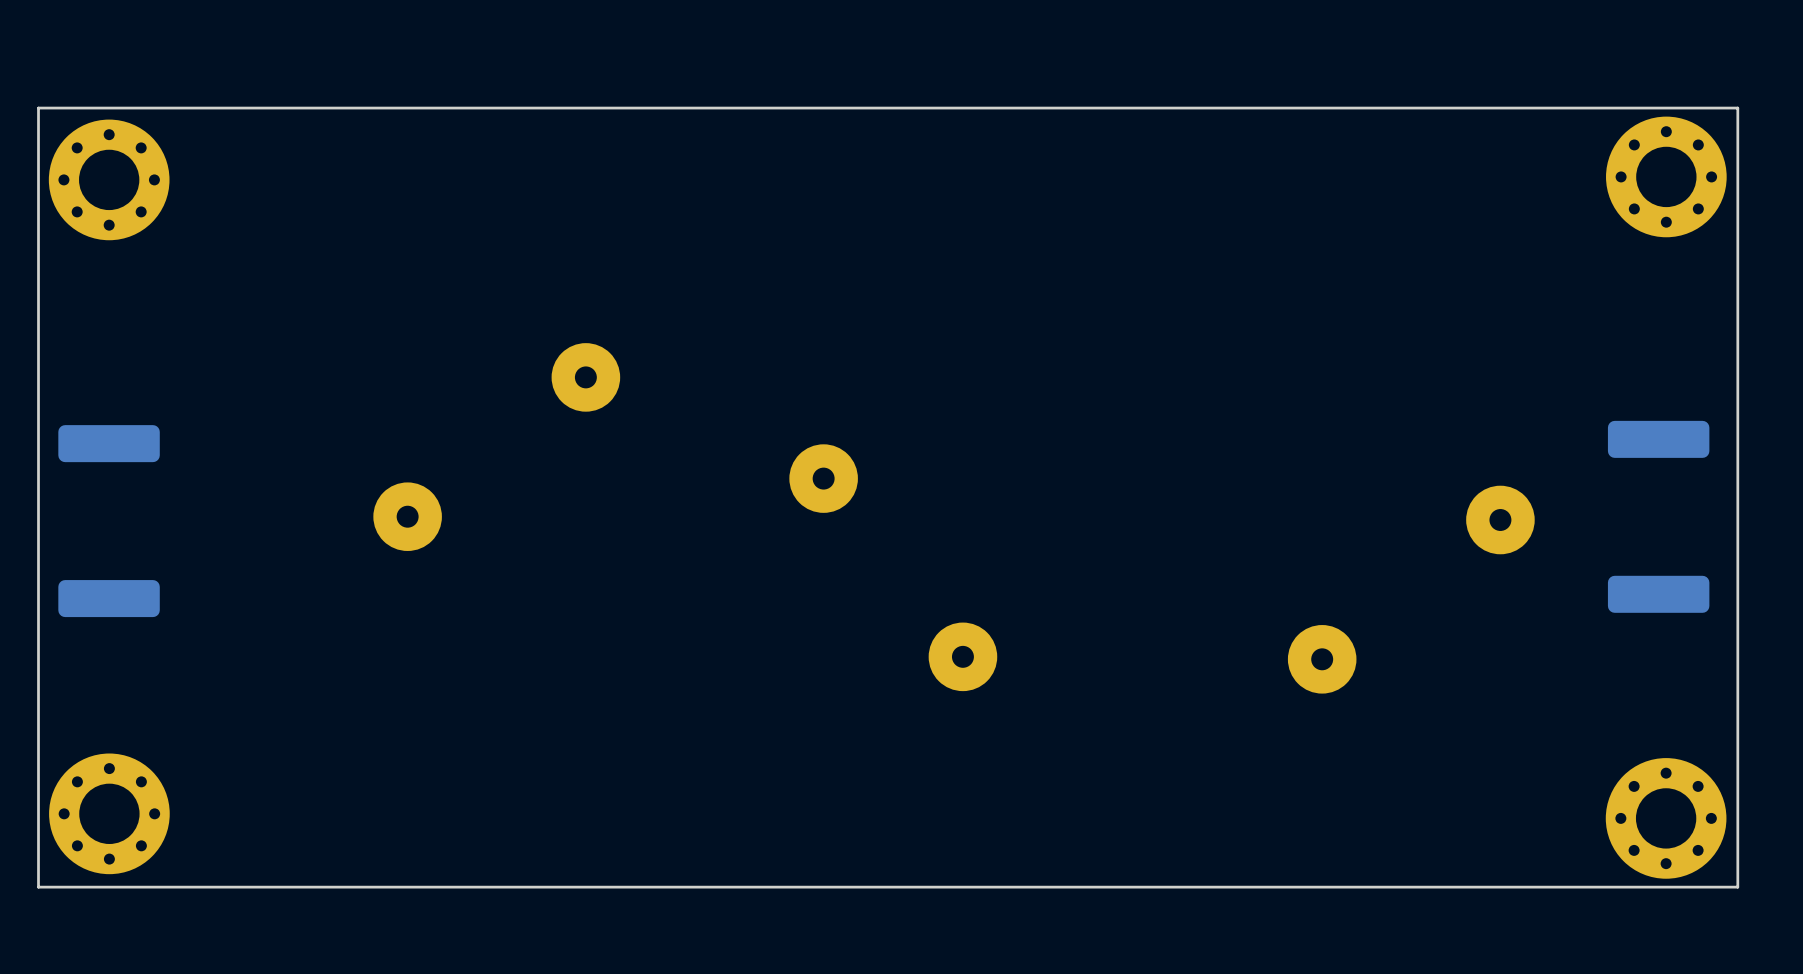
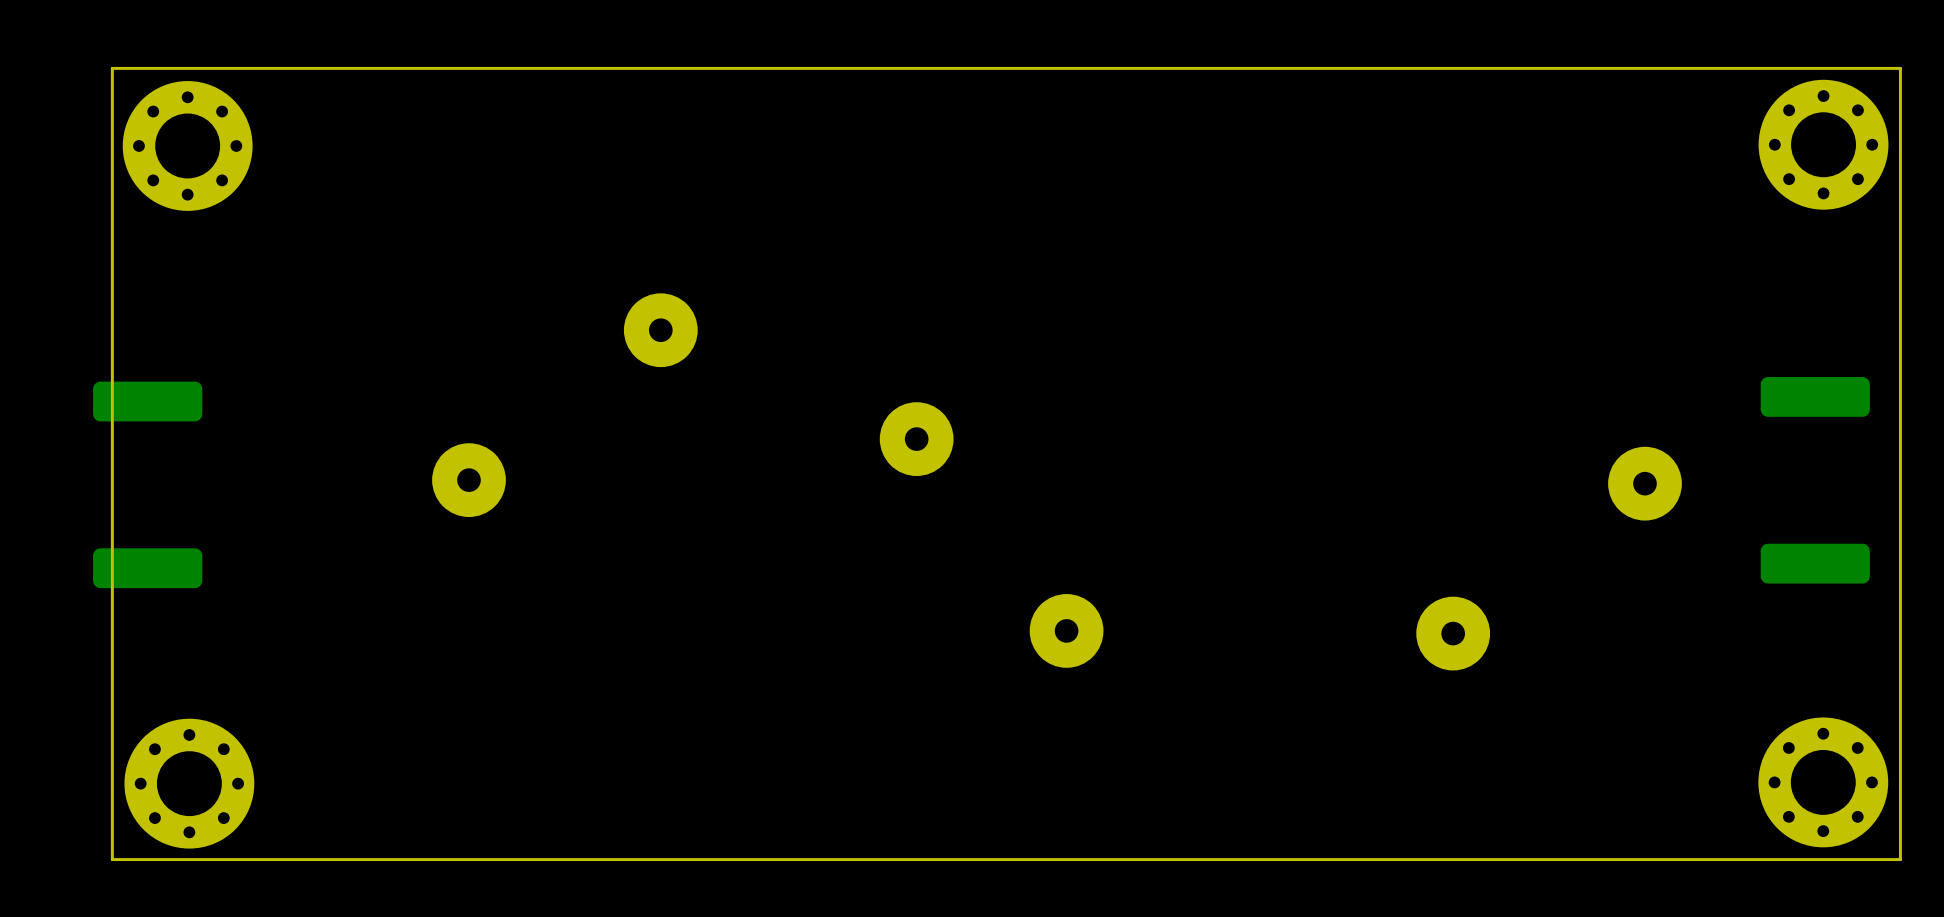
board edge: (1737, 134) (1737, 108) (38, 108) (38, 887) (1737, 887) (1737, 869) -> (1900, 68) (112, 68) (112, 859) (1900, 859)
part position: (1666, 176) -> (1823, 144)
part position: (109, 179) -> (187, 145)
part position: (109, 813) -> (189, 783)
part position: (1666, 818) -> (1823, 782)

